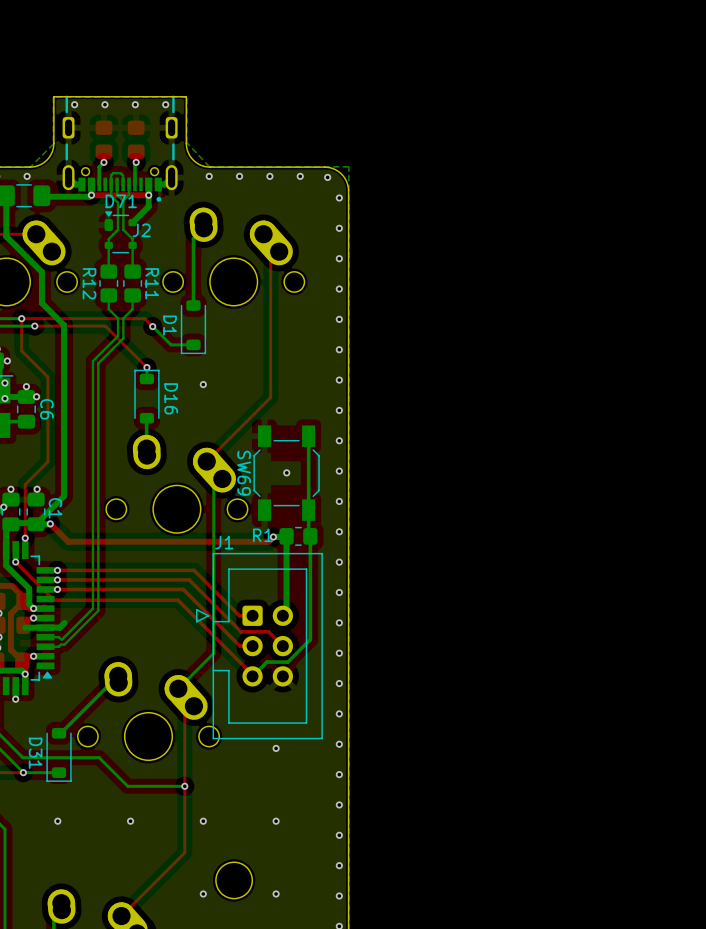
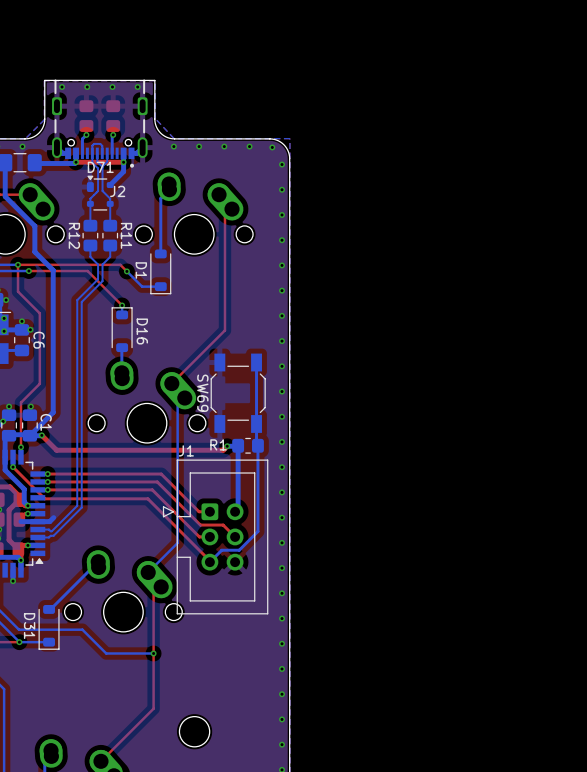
via: (203, 384) -> none
via: (286, 472) -> none
via: (276, 748) -> none
via: (57, 821) -> none
via: (130, 821) -> none
via: (203, 821) -> none
via: (276, 821) -> none
via: (203, 893) -> none
via: (276, 893) -> none

